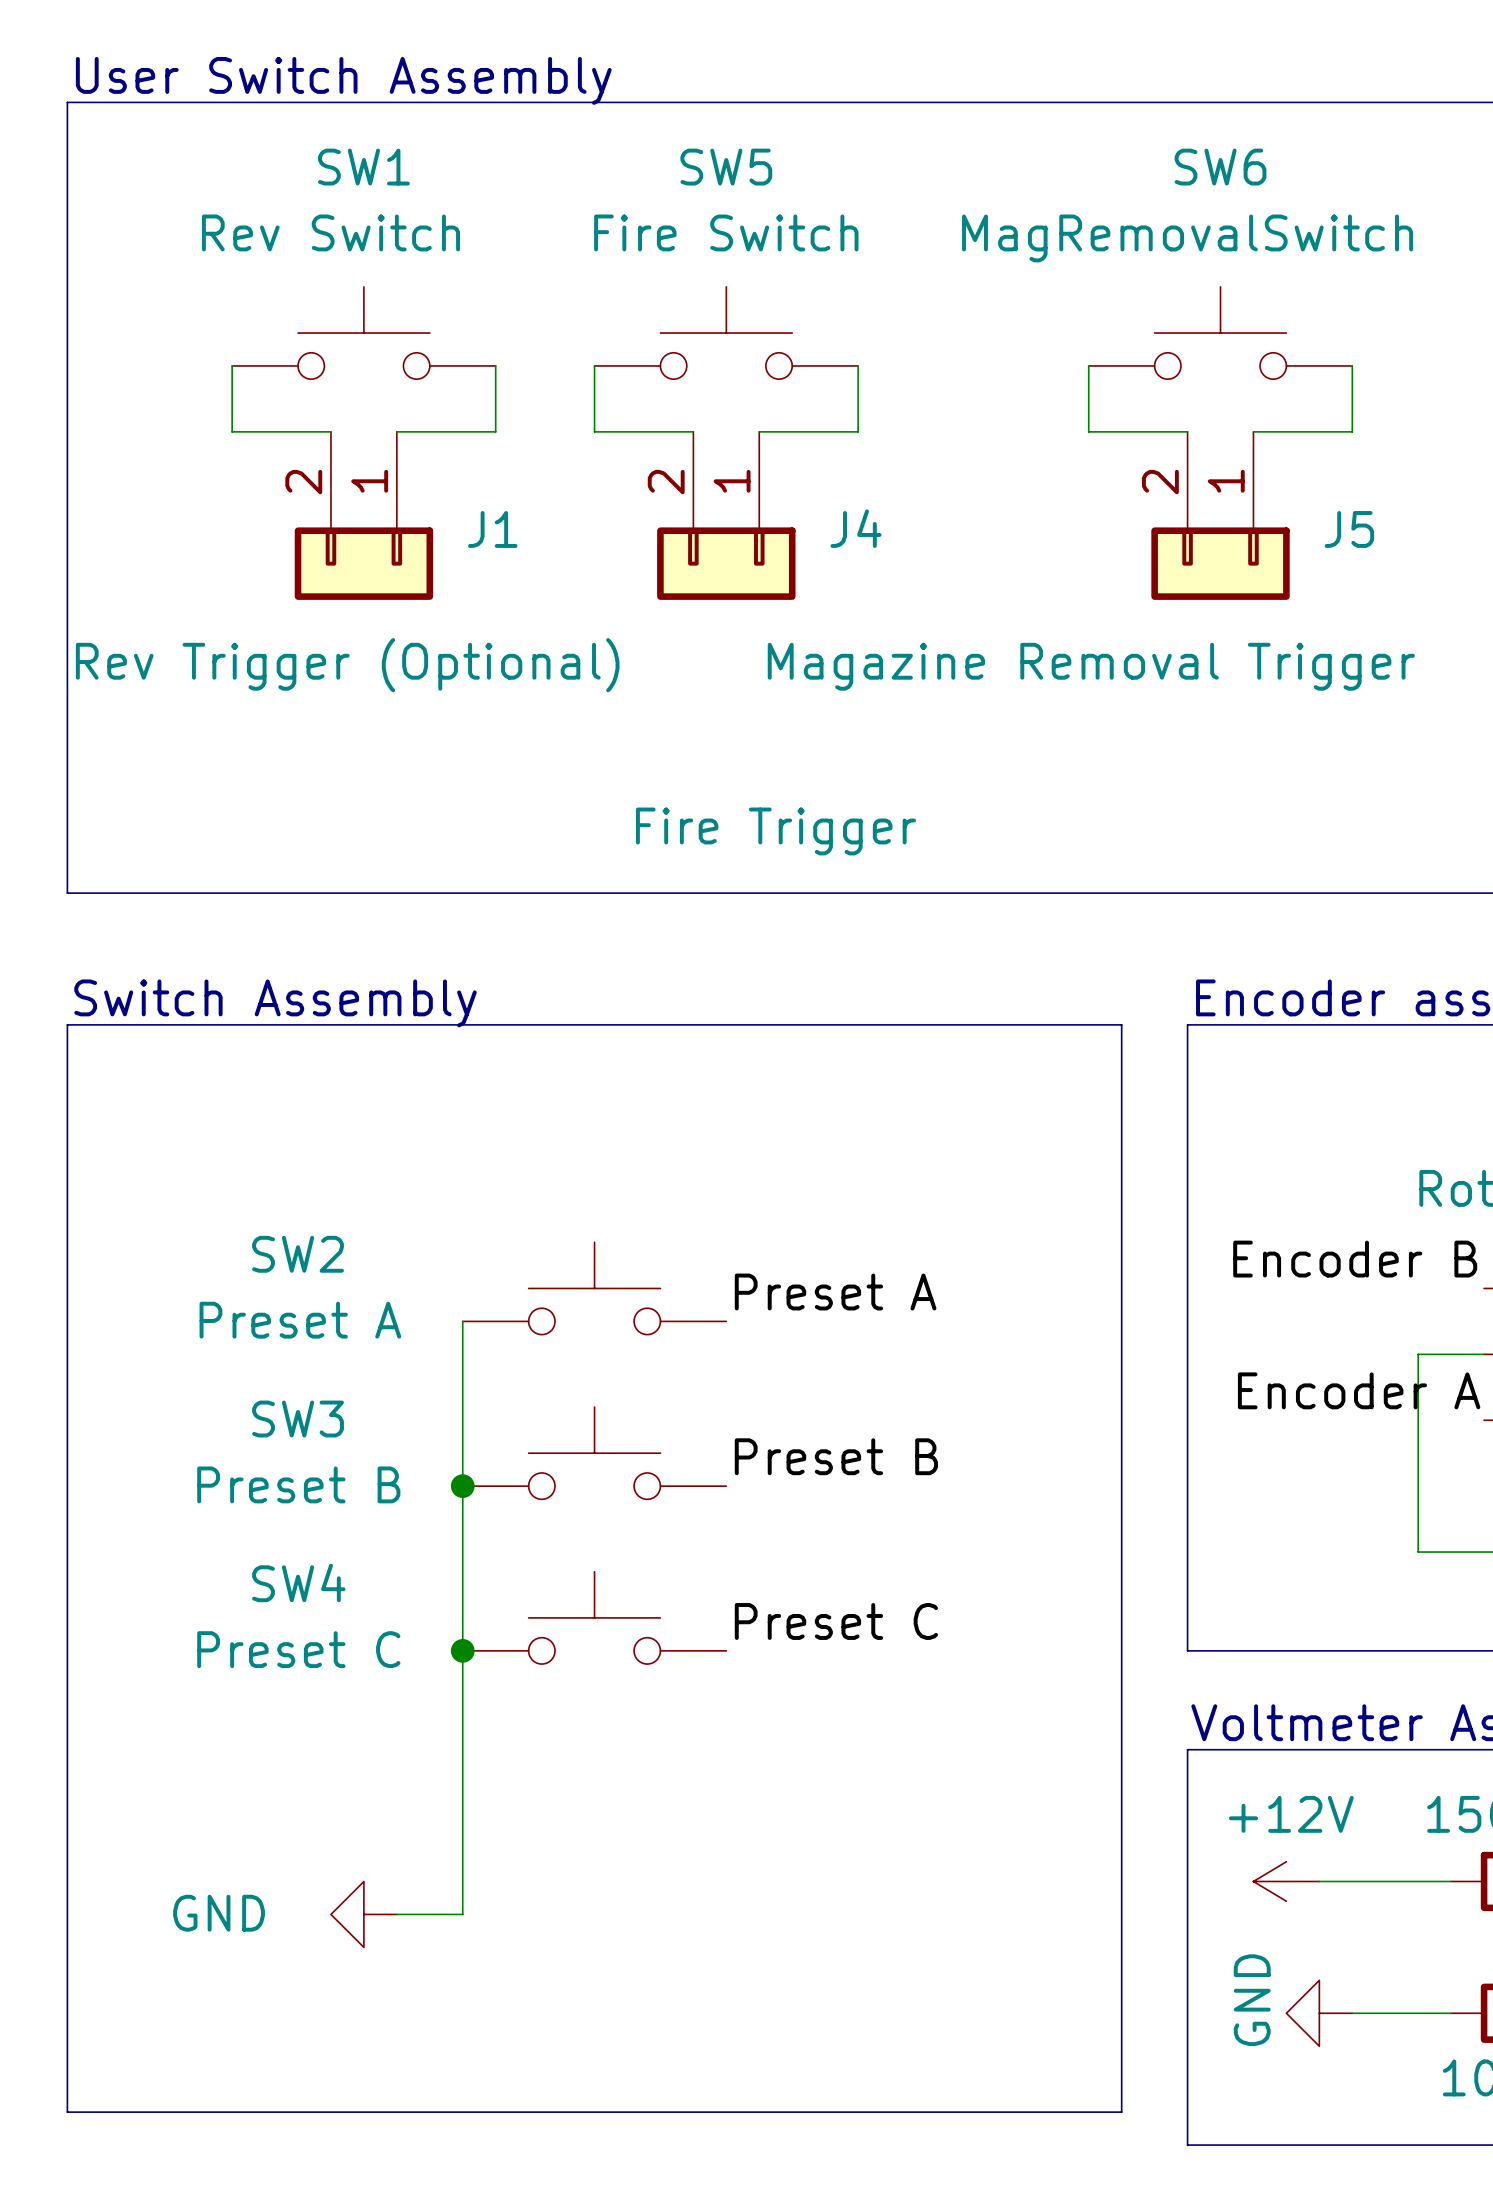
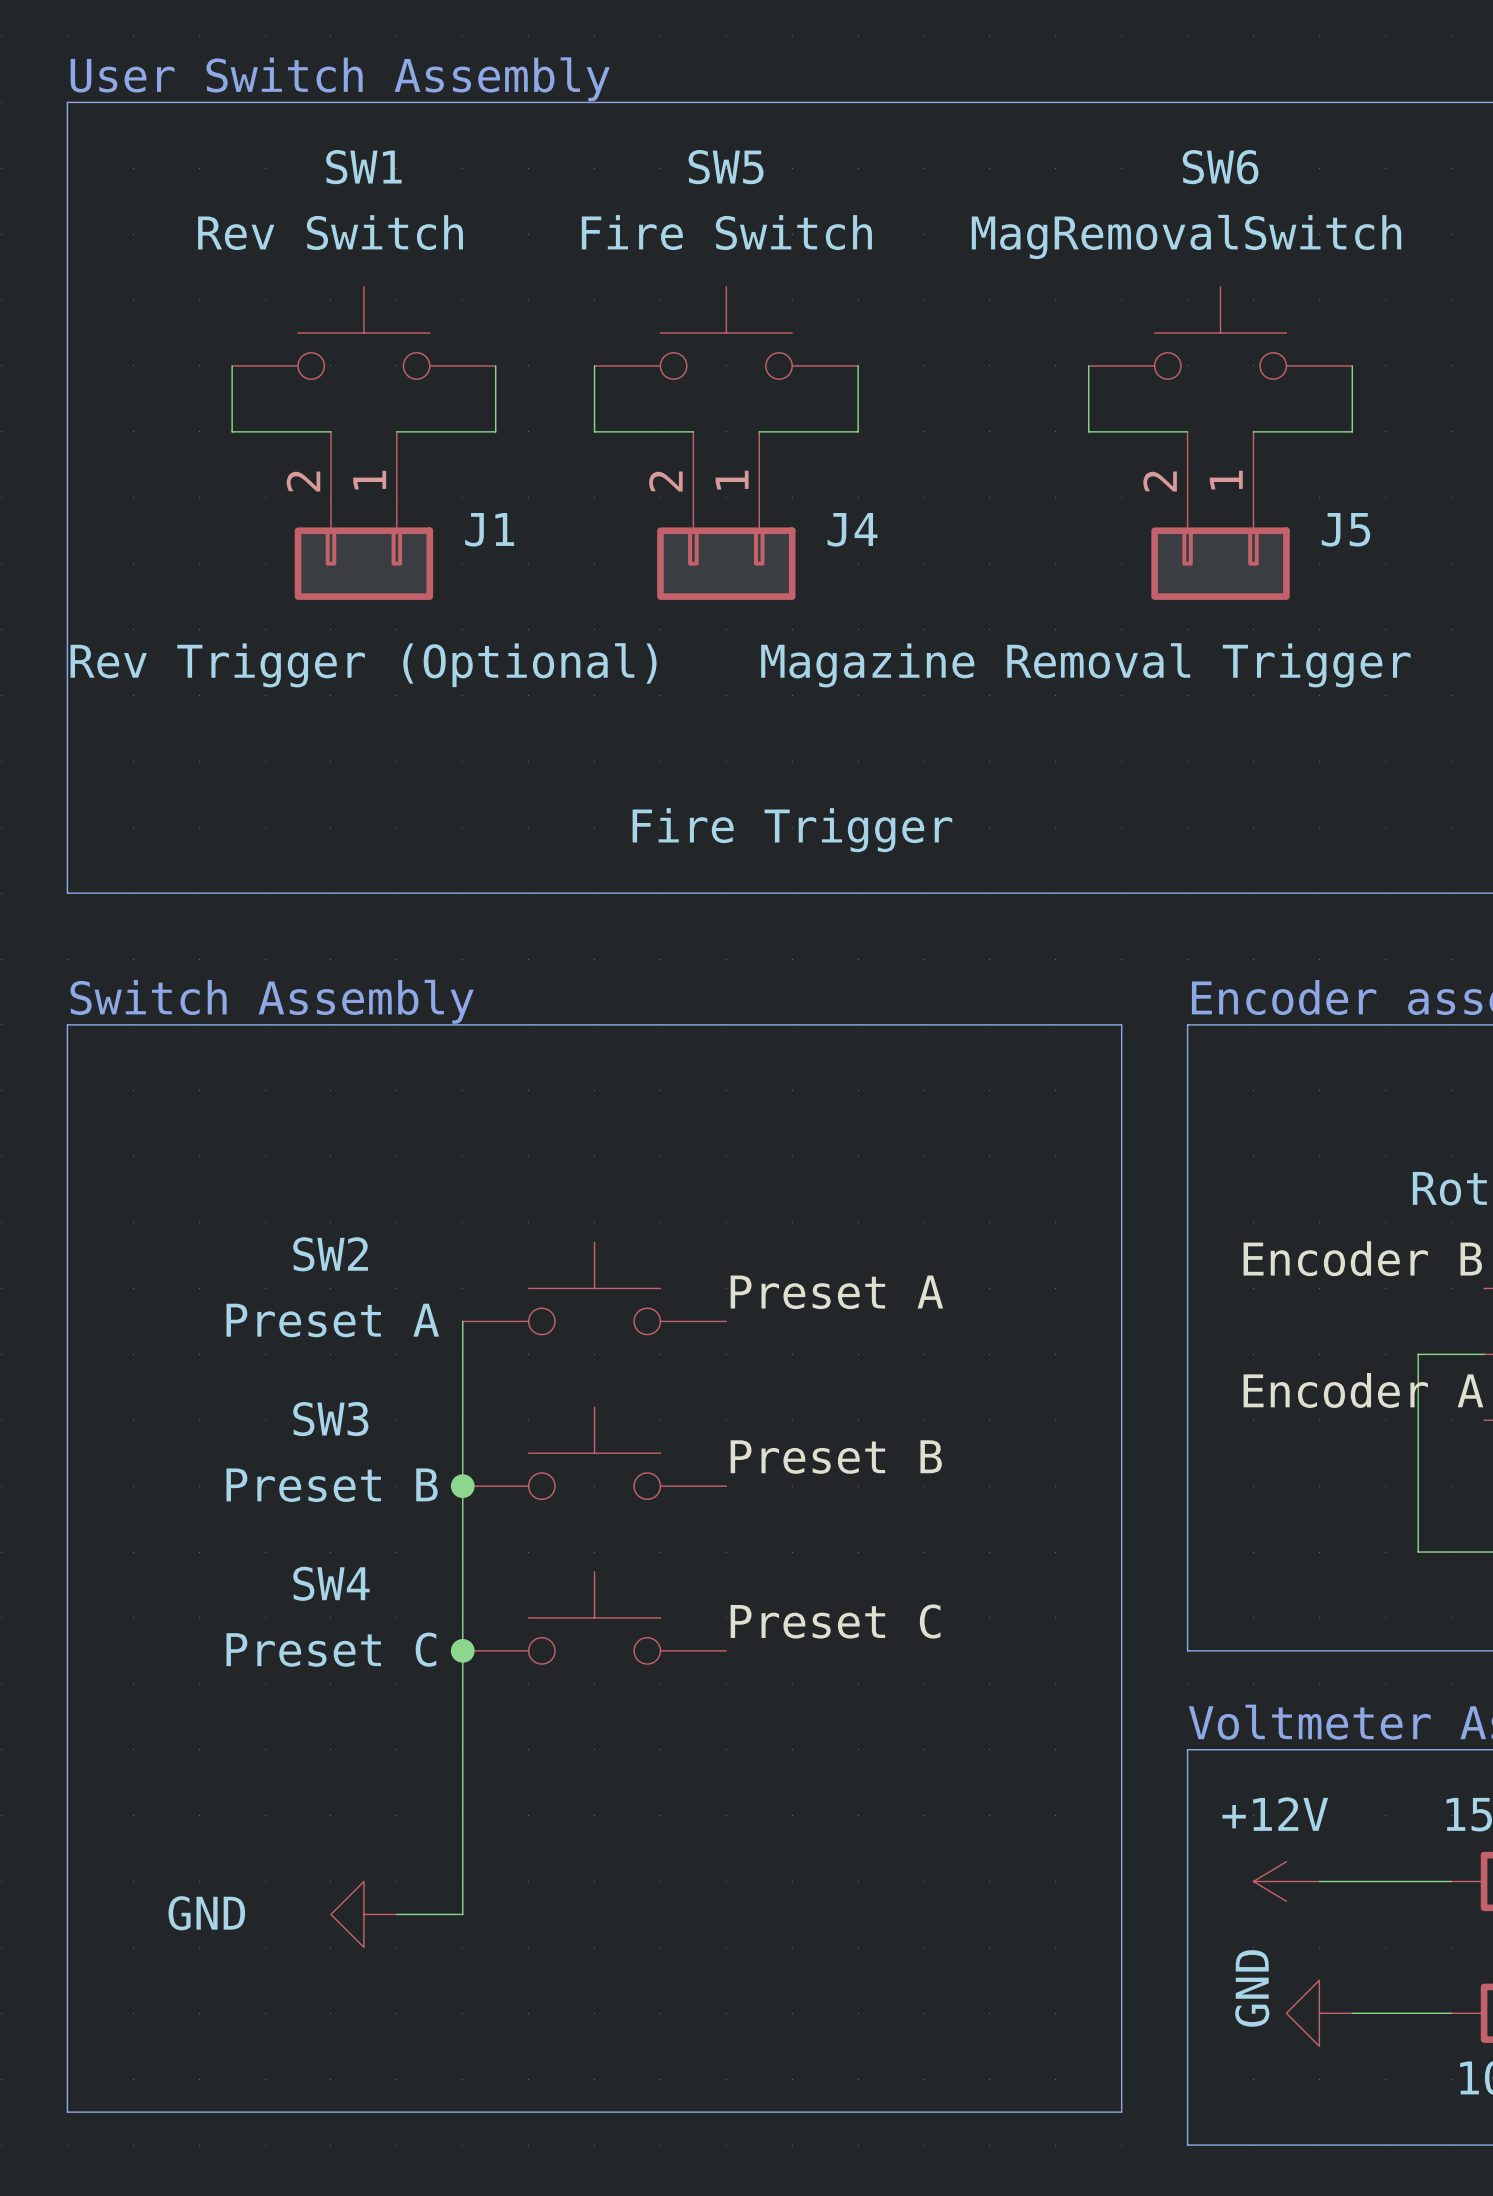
SW2 name position: SW2 (298, 1254) -> SW2 (330, 1254)
SW2 value position: Preset A (300, 1320) -> Preset A (332, 1320)
SW3 name position: SW3 (298, 1419) -> SW3 (330, 1419)
SW3 value position: Preset B (298, 1484) -> Preset B (332, 1485)
SW4 name position: SW4 (298, 1582) -> SW4 (331, 1583)
SW4 value position: Preset C (298, 1649) -> Preset C (331, 1649)

